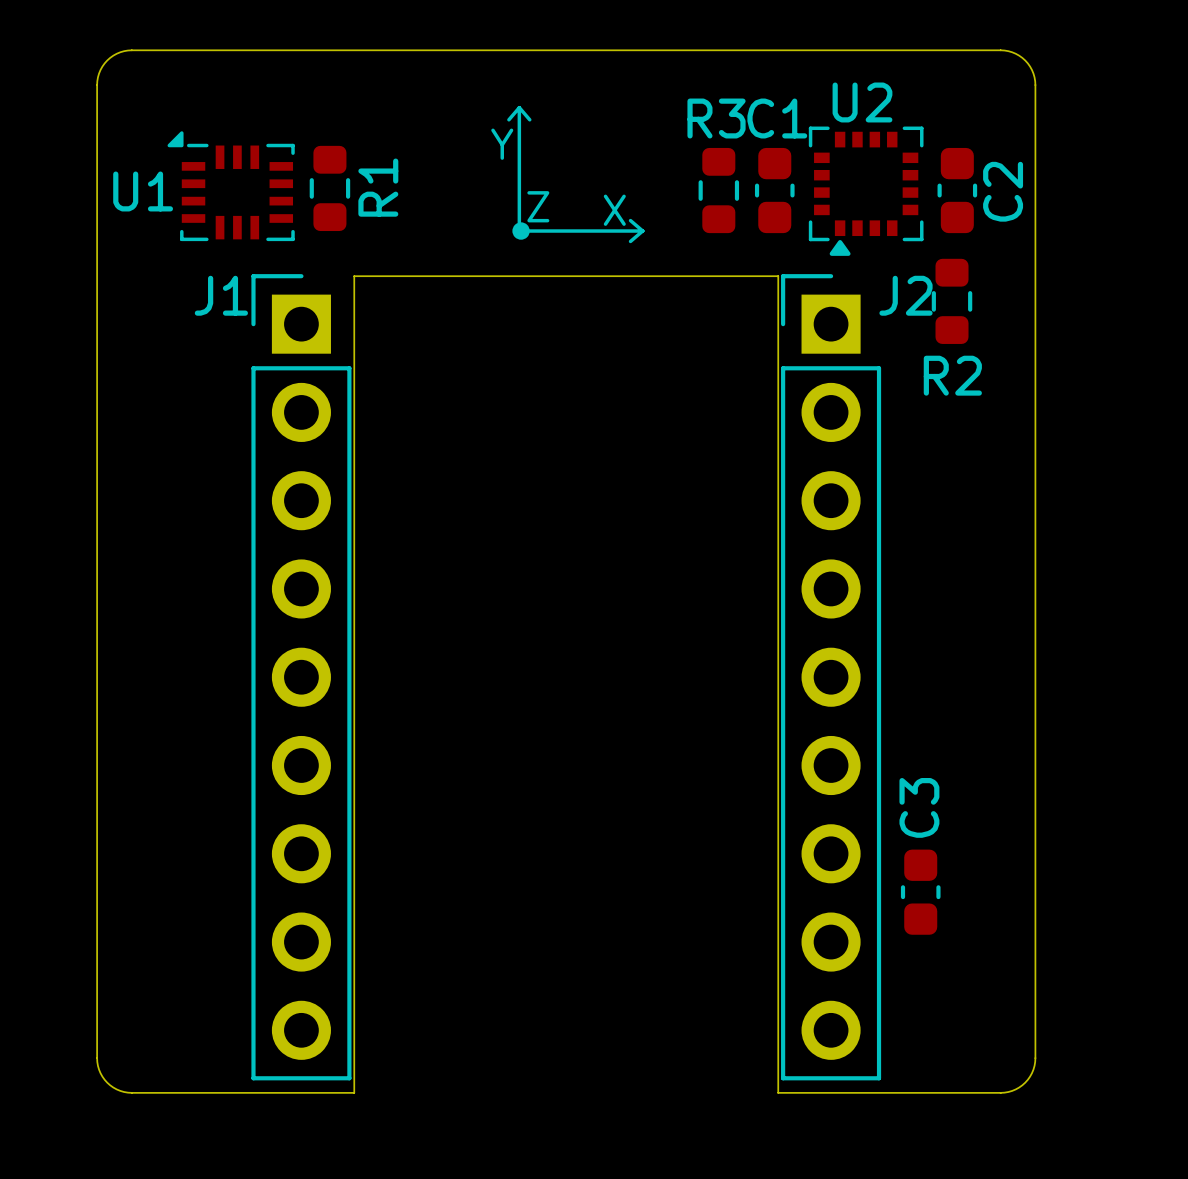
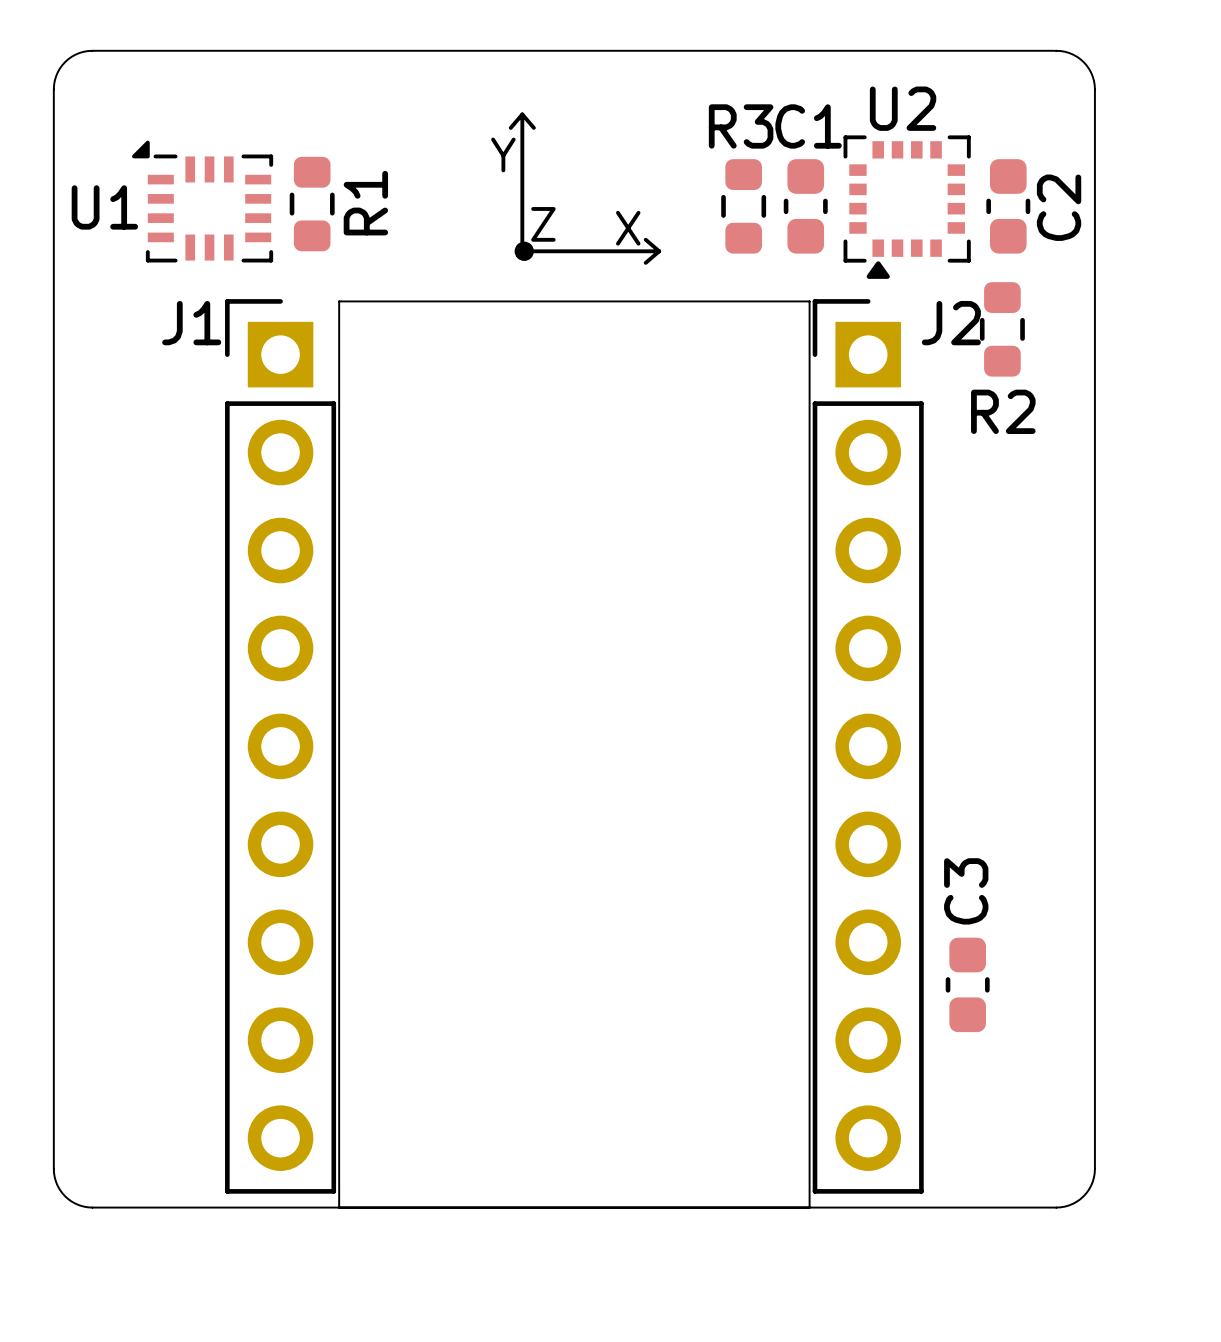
board edge: none -> (339, 1207) (809, 1207)

